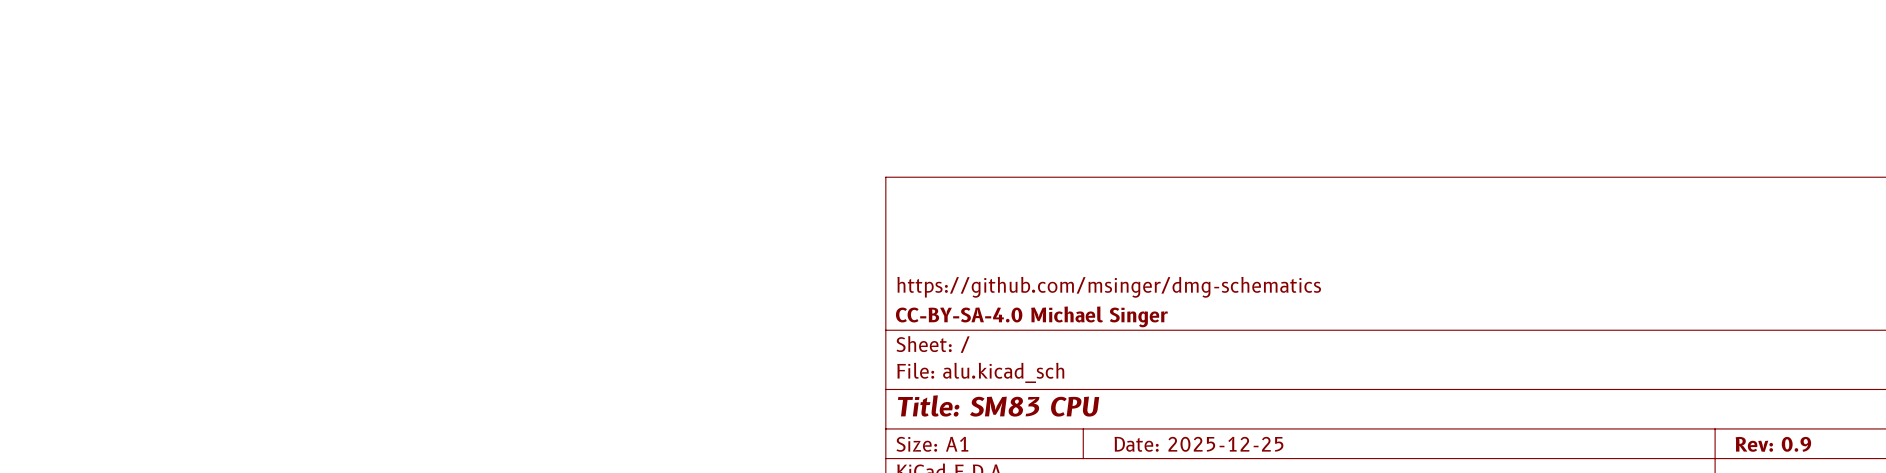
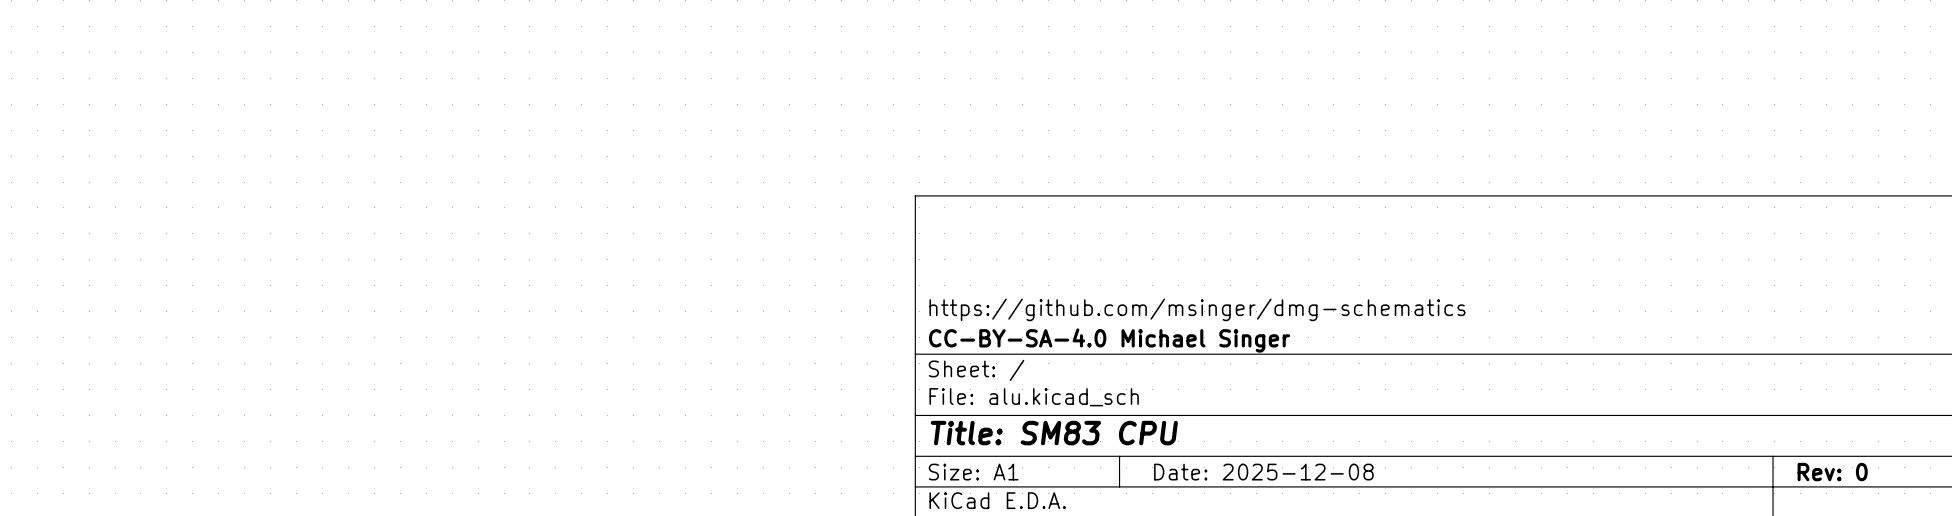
title block: Date: 2025-12-25 (1198, 444) -> Date: 2025-12-08 (1263, 472)
title block: Rev: 0.9 (1773, 444) -> Rev: 0 (1832, 472)

